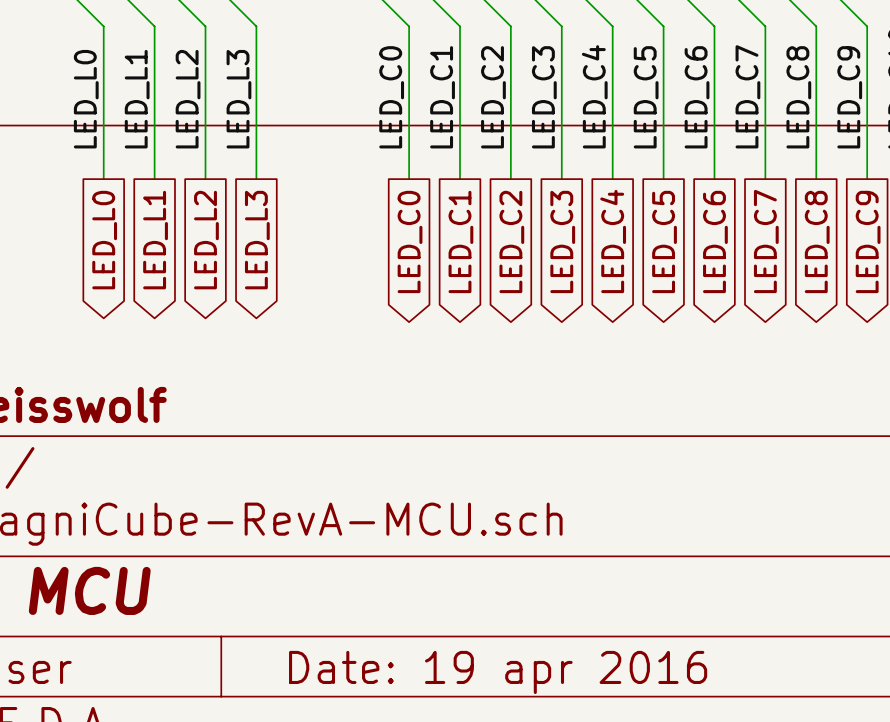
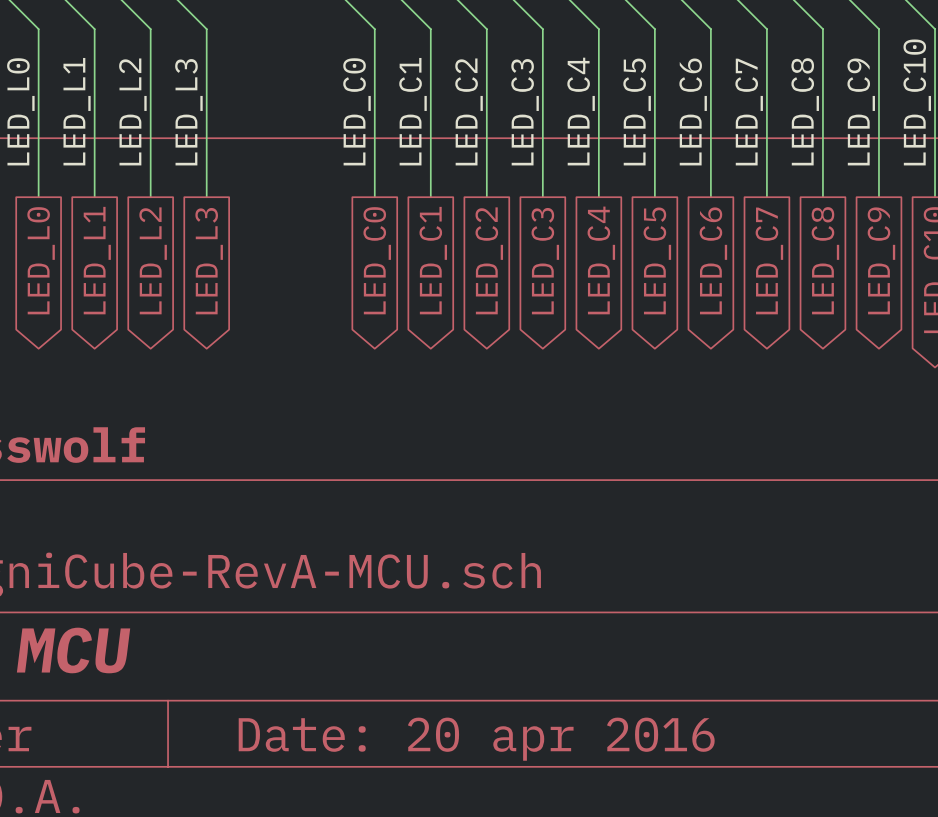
title block: Date: 19 apr 2016 (498, 672) -> Date: 20 apr 2016 (476, 739)

